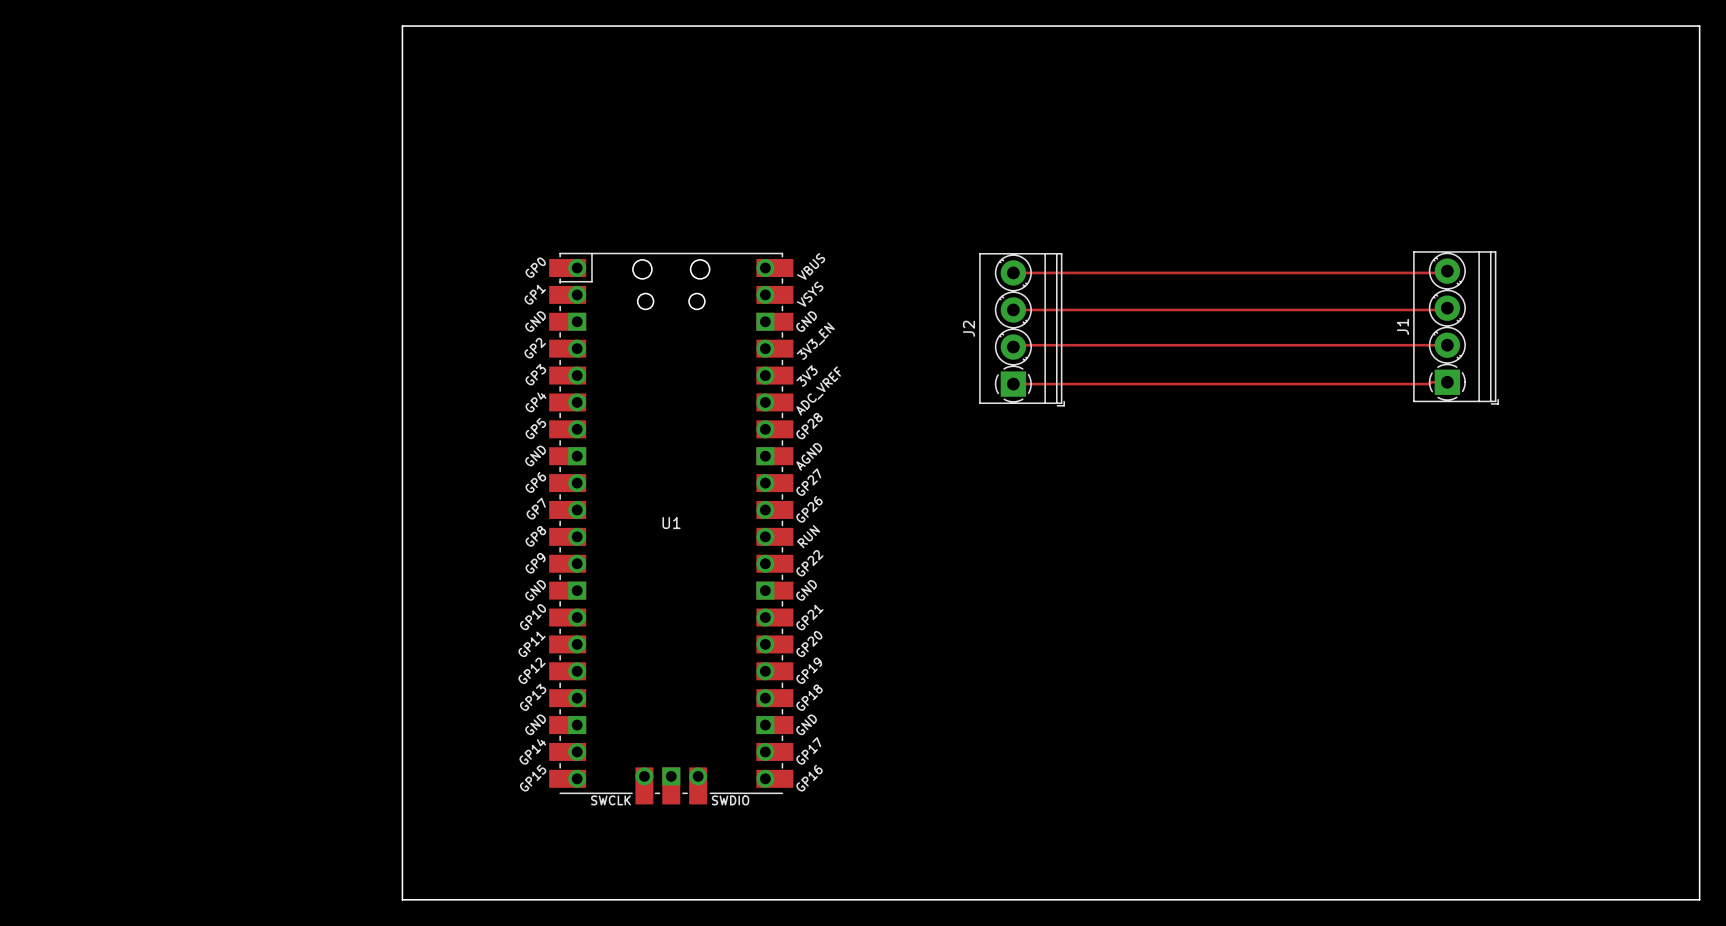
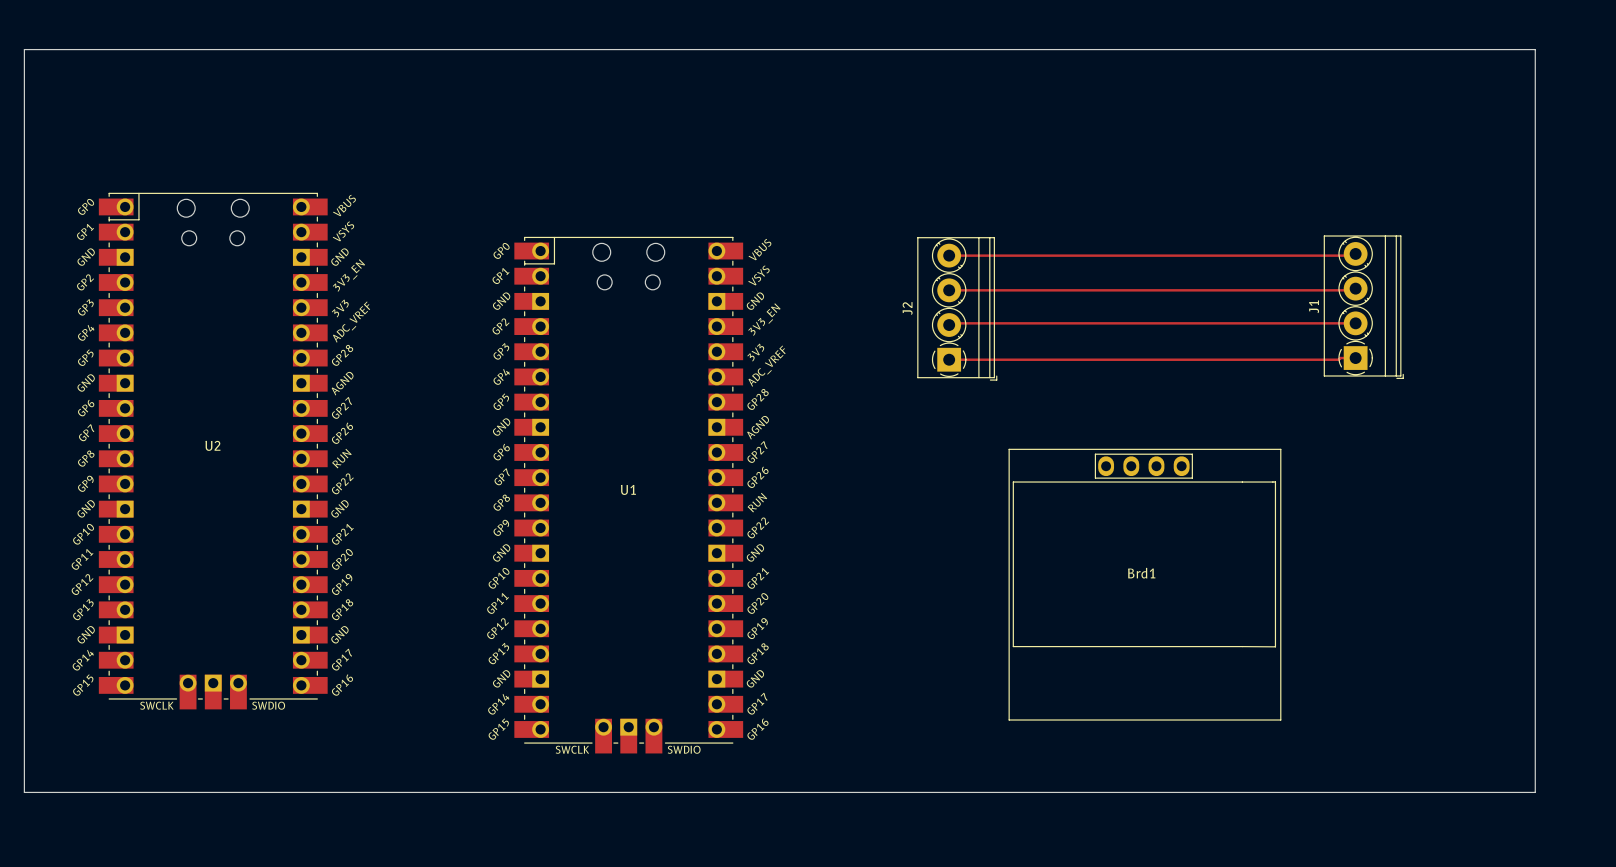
board edge: (402, 26) (1699, 26) (1699, 899) (402, 899) (402, 26) -> (24, 49) (24, 792) (1535, 792) (1535, 49) (24, 49)
U2: none -> (213, 451)
Brd1: none -> (1144, 584)

